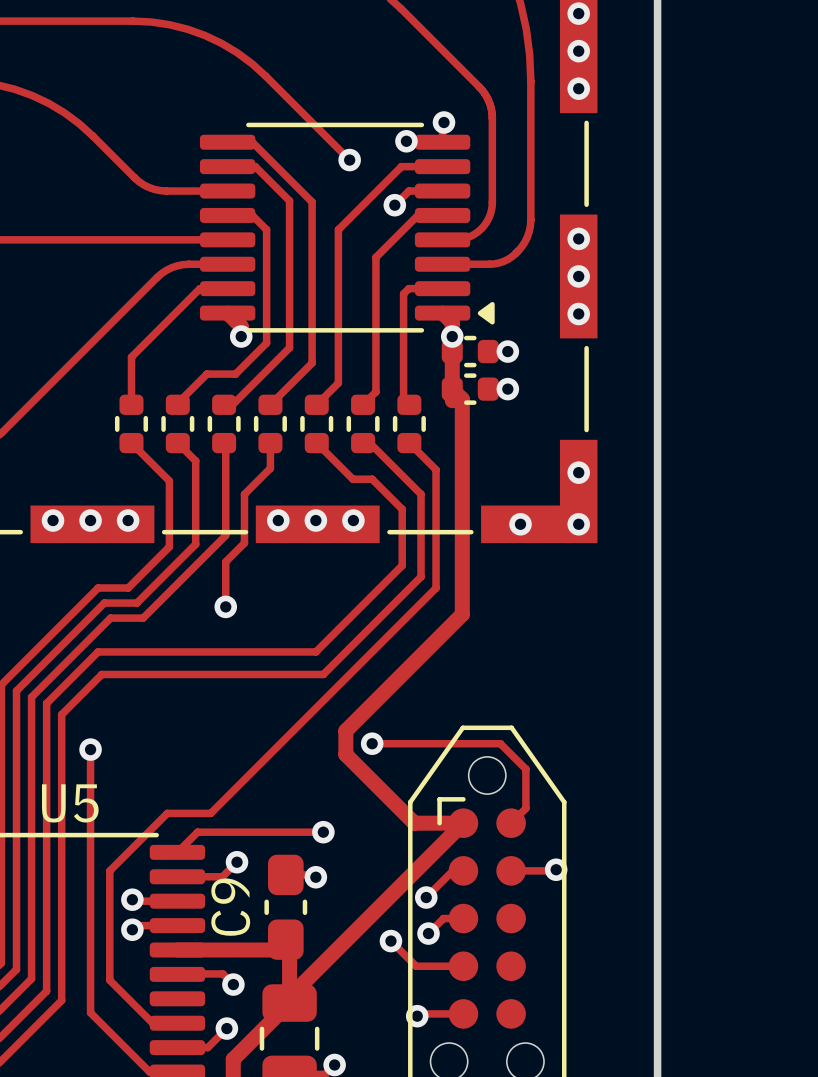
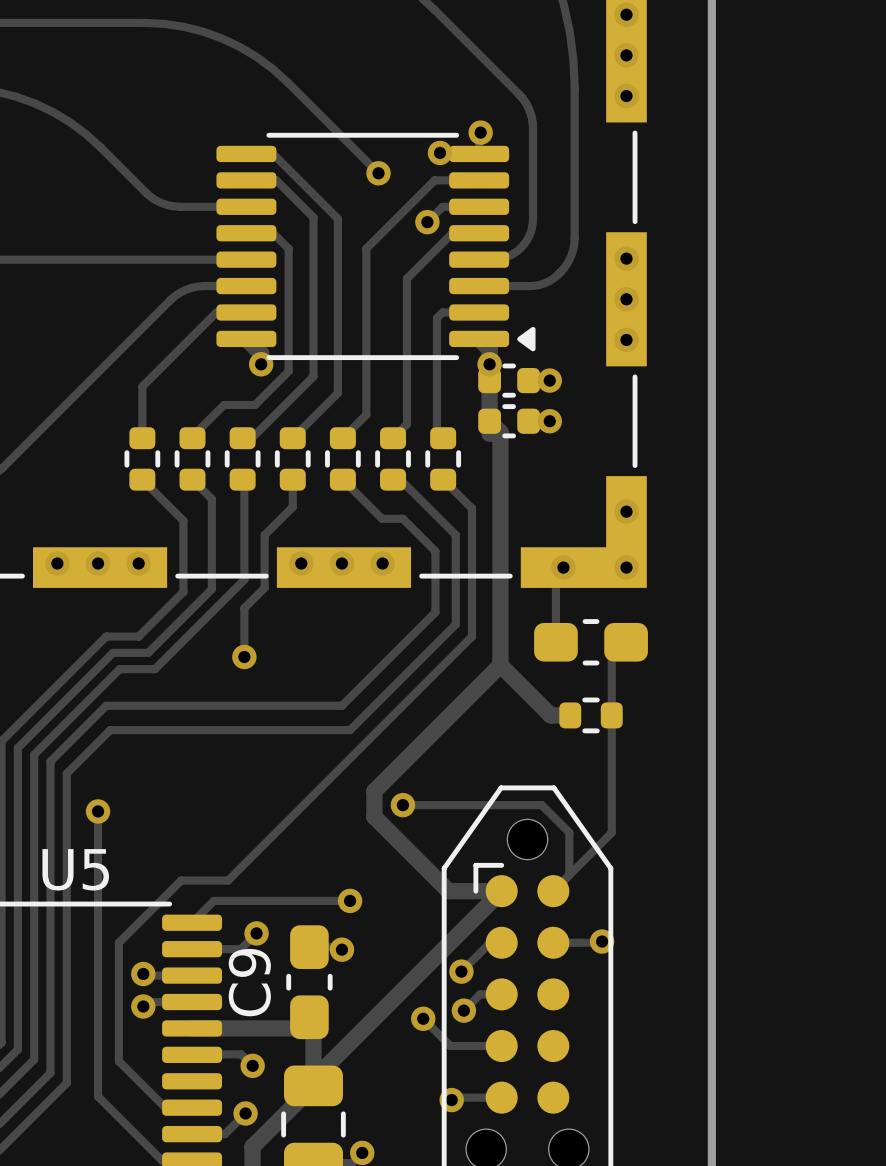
track: none -> (563, 567) (555, 575) (555, 642)
part: none -> (591, 642)
track: none -> (635, 642) (626, 642) (611, 656) (611, 832) (569, 875)
track: none -> (500, 665) (550, 715) (570, 715)
part: none -> (591, 715)

